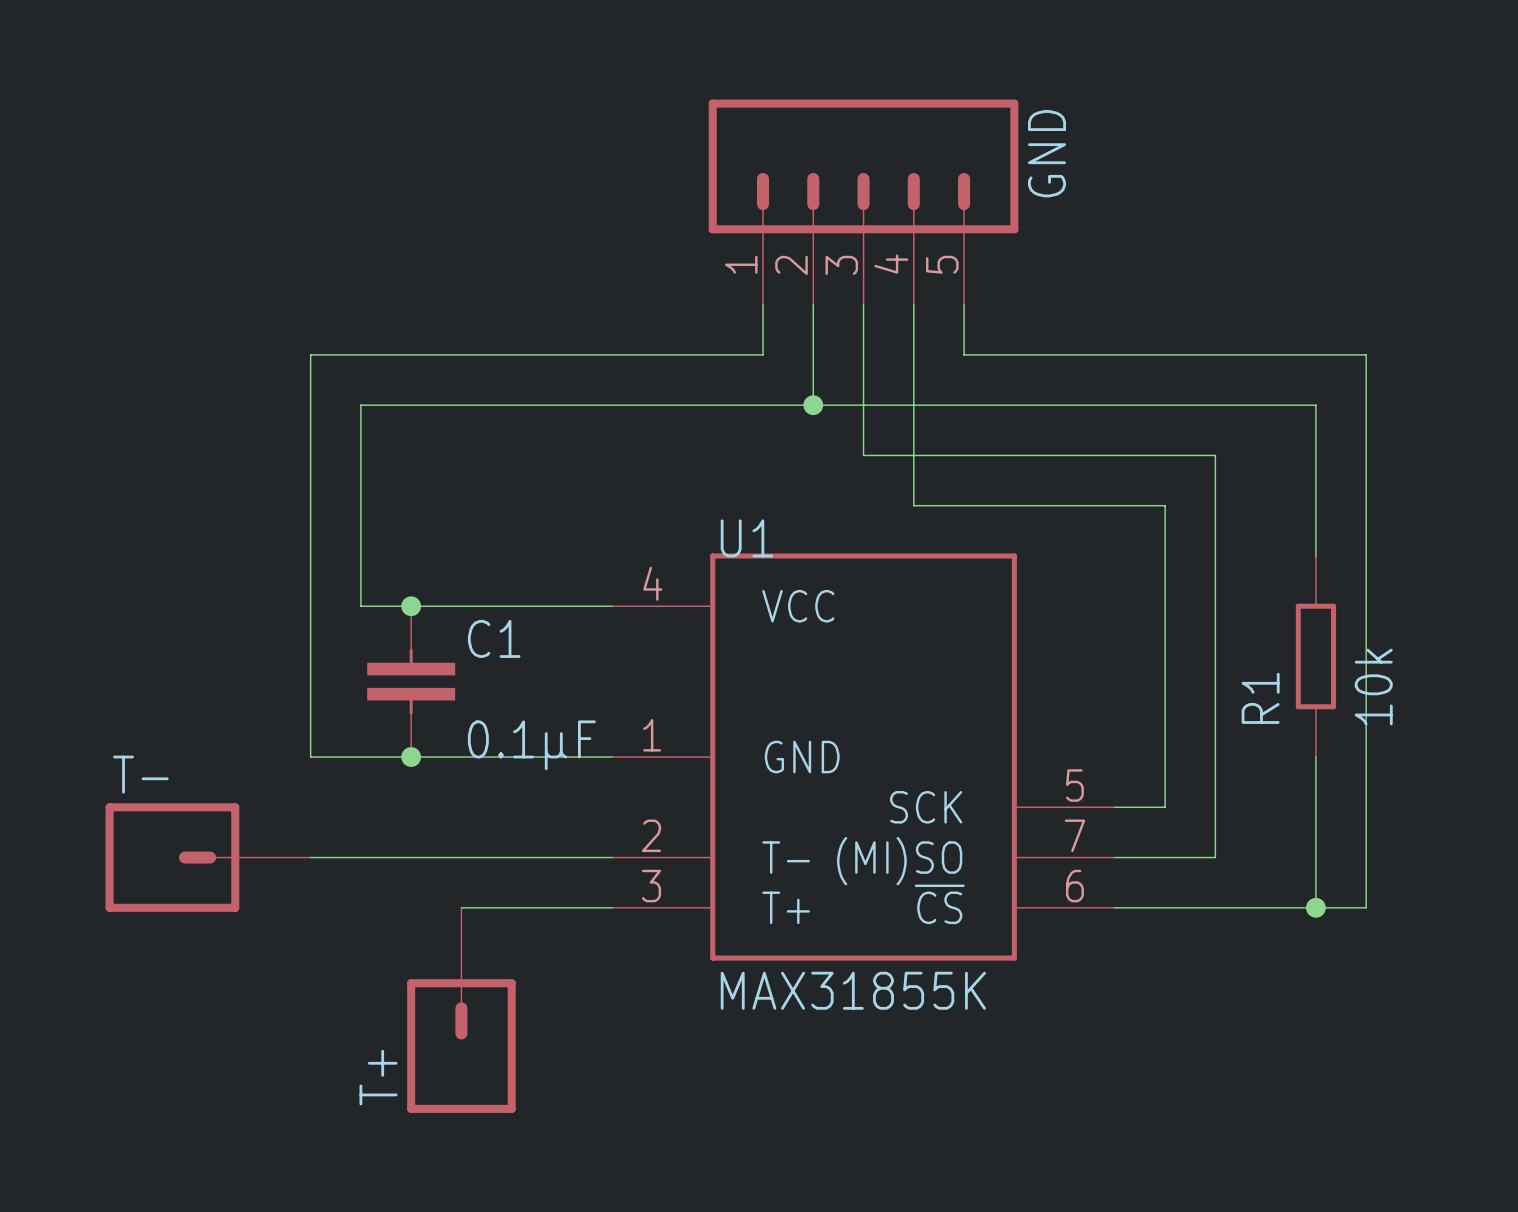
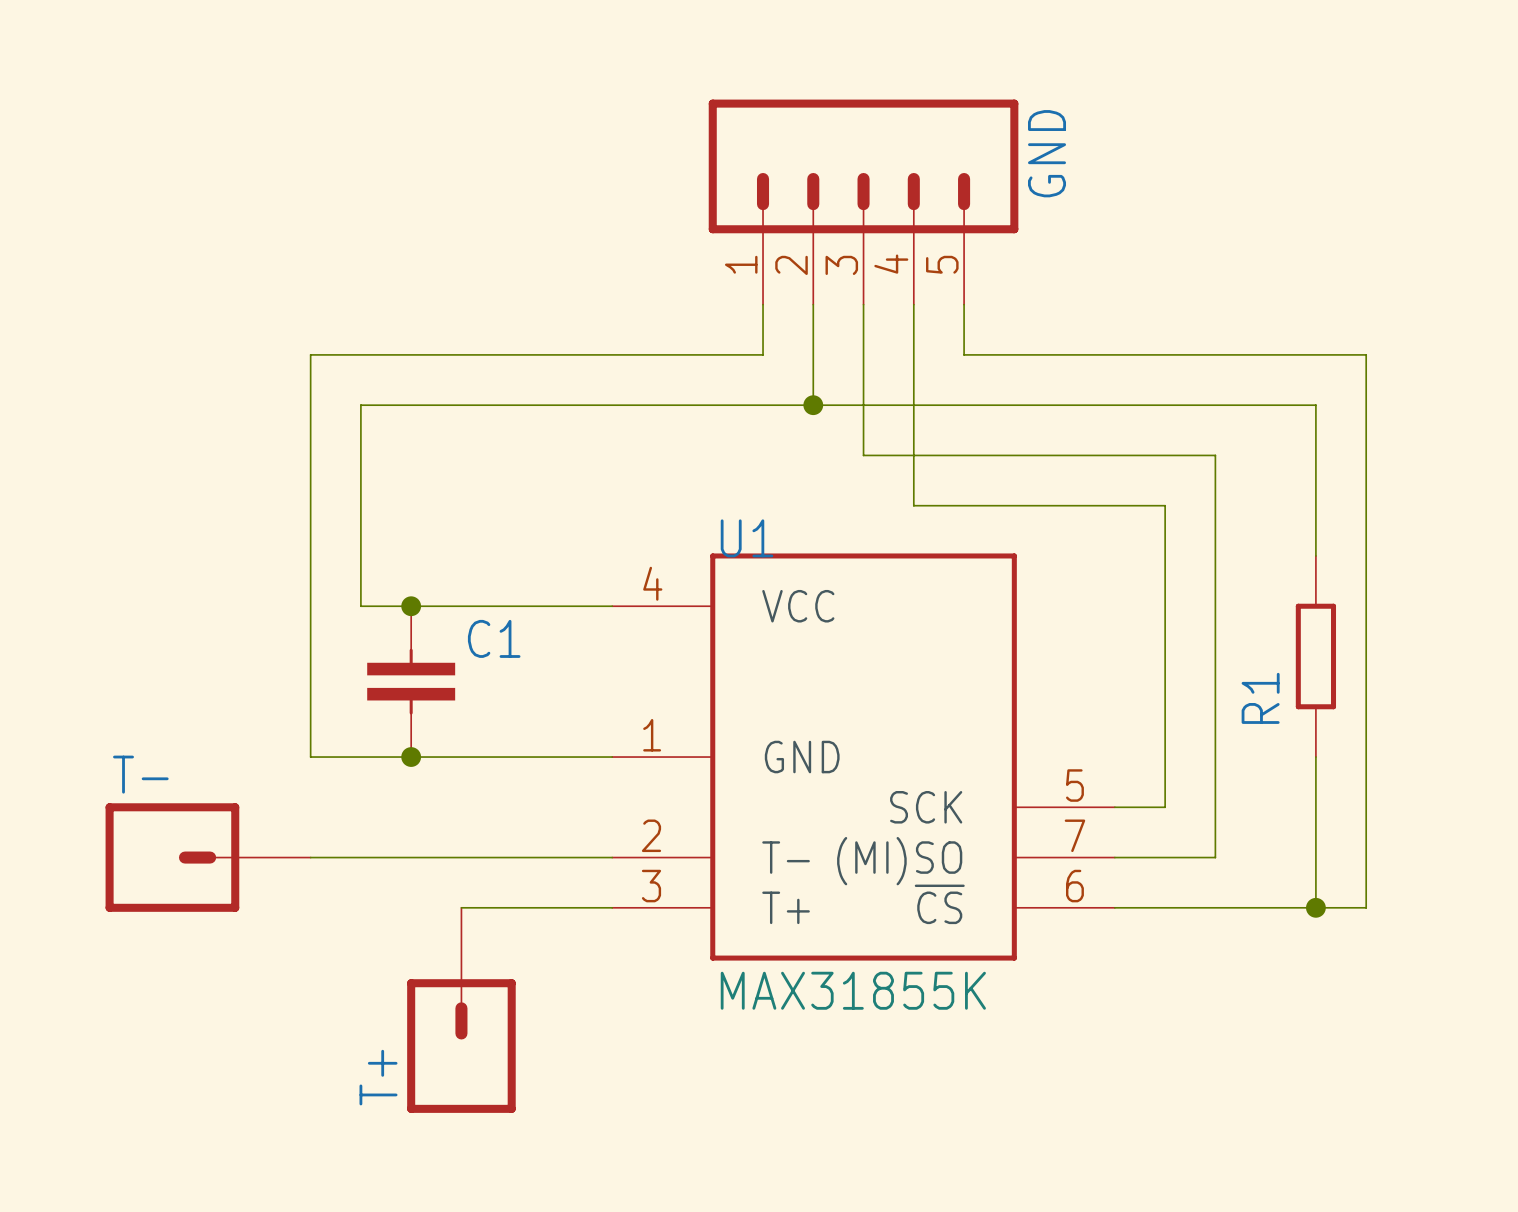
R1 value: 10k (1373, 687) -> none
C1 value: 0.1µF (531, 745) -> none

